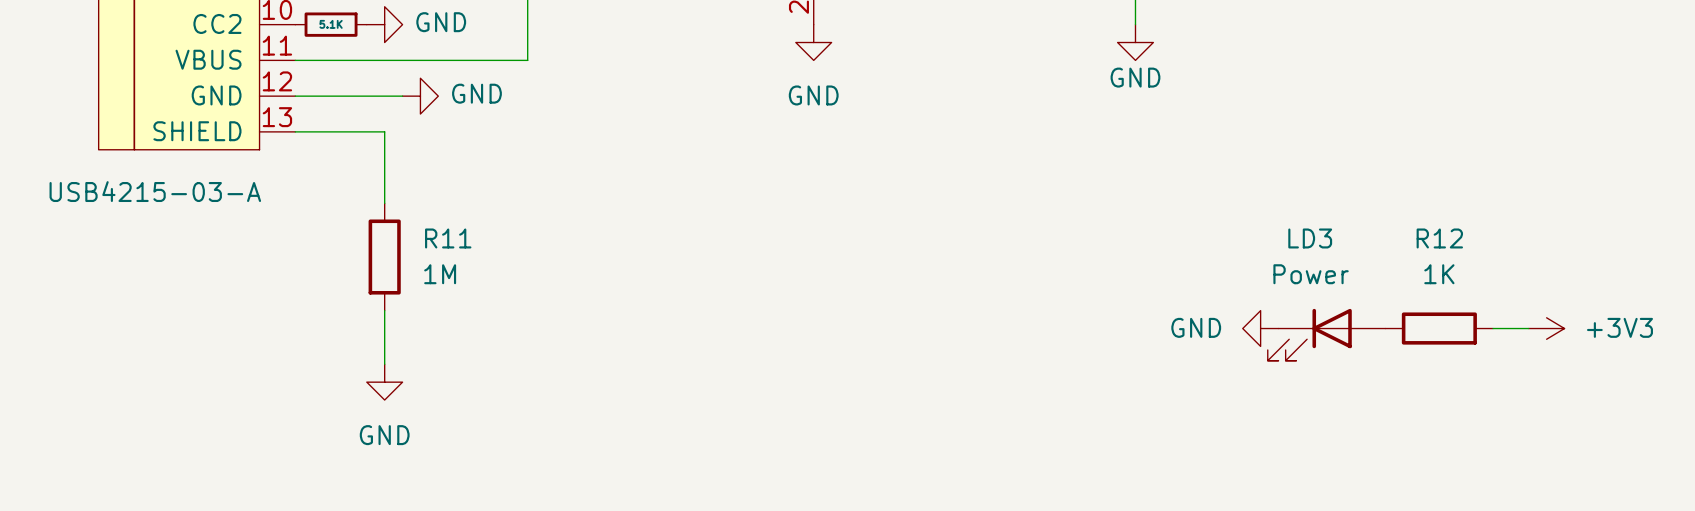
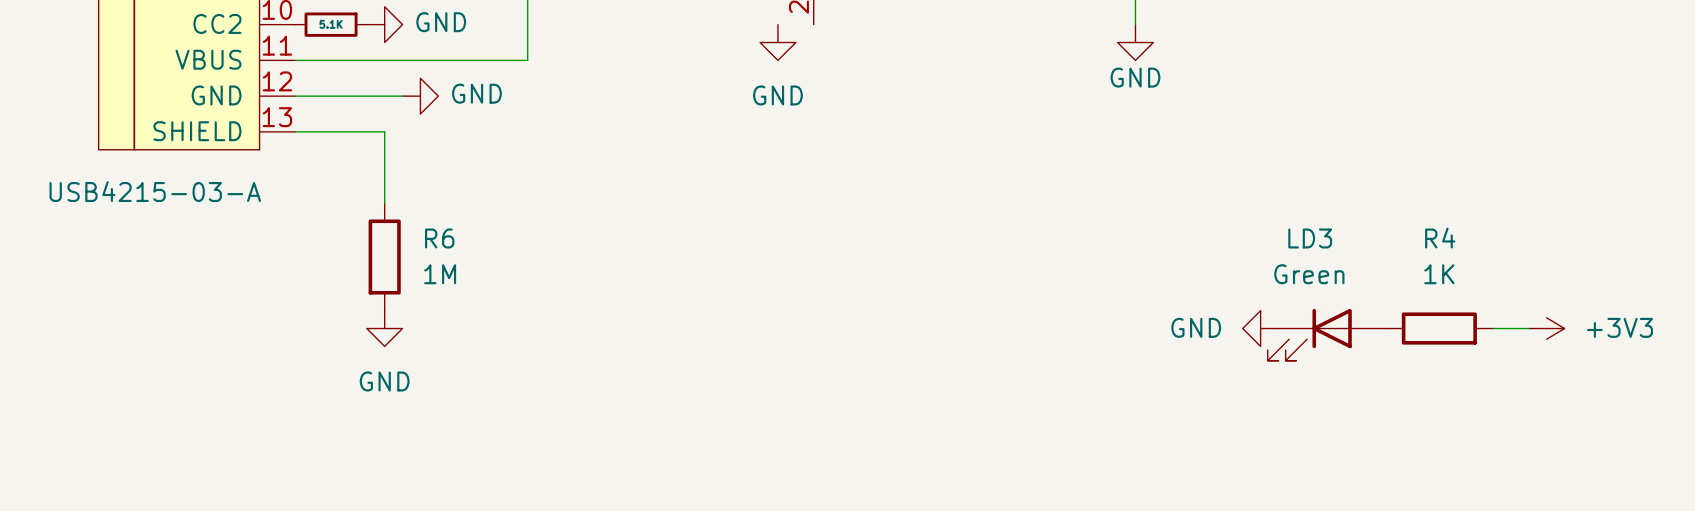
power symbol position: GND (813, 42) -> GND (777, 42)
R11 name: R11 (448, 238) -> R6 (439, 238)
R12 name: R12 (1439, 238) -> R4 (1440, 238)
LD3 value: Power (1311, 274) -> Green (1309, 274)
wire: (384, 310) (384, 364) -> none
power symbol position: GND (384, 382) -> GND (384, 328)

